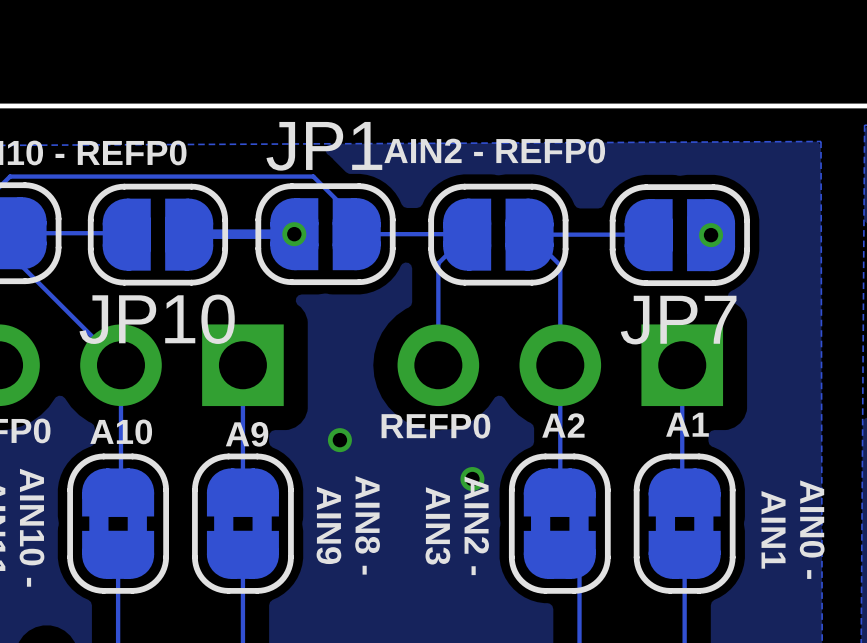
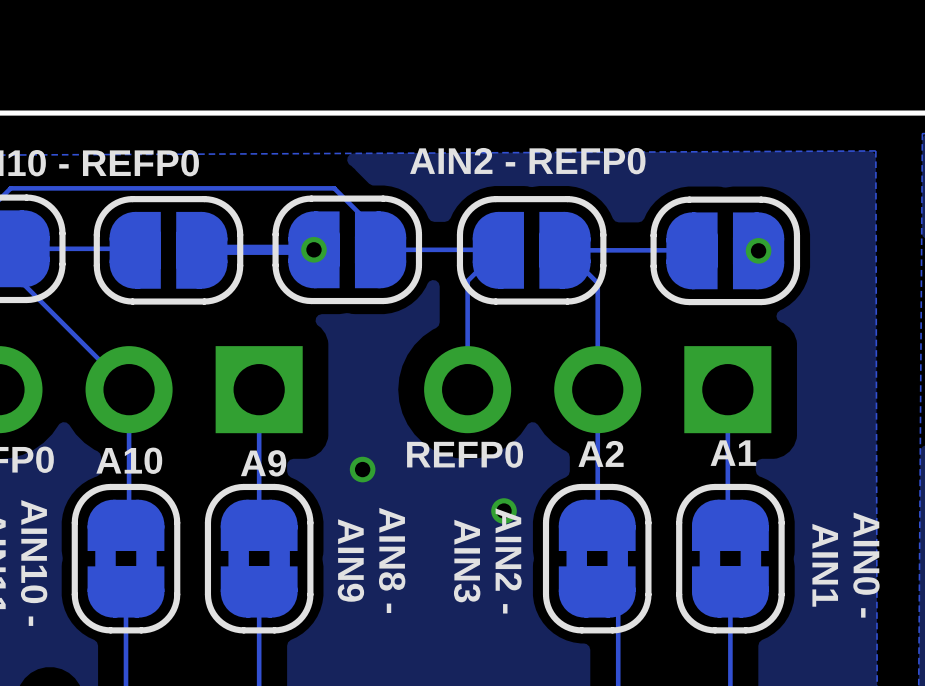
JP1 name: JP1 (324, 146) -> none
JP10 name: JP10 (157, 319) -> none
JP7 name: JP7 (678, 320) -> none

